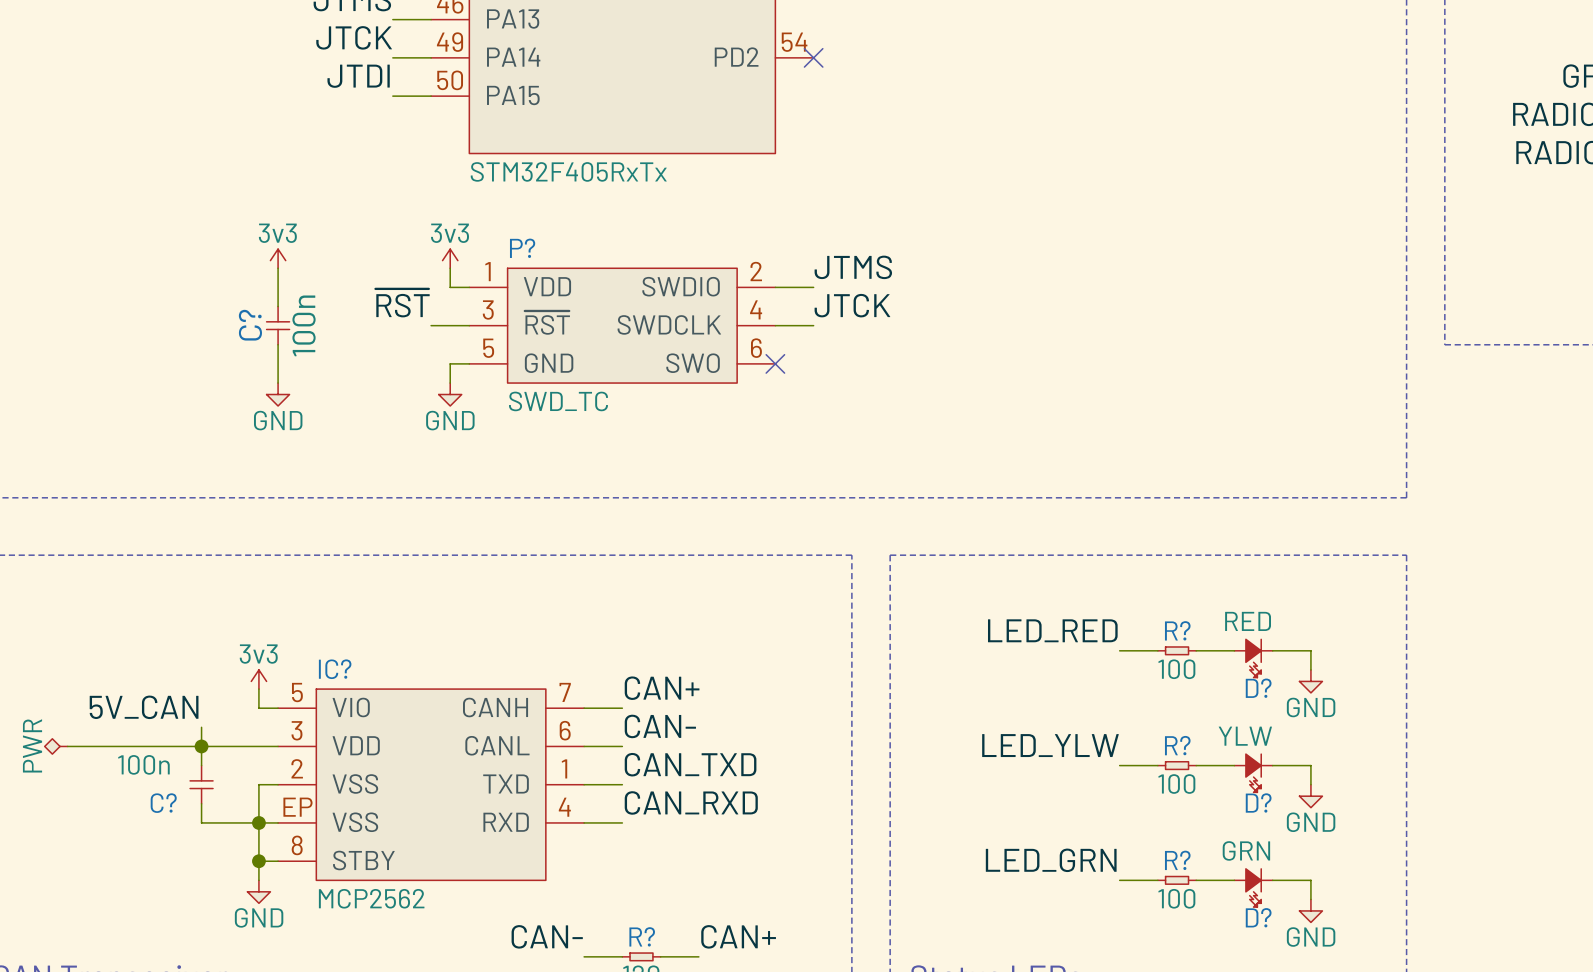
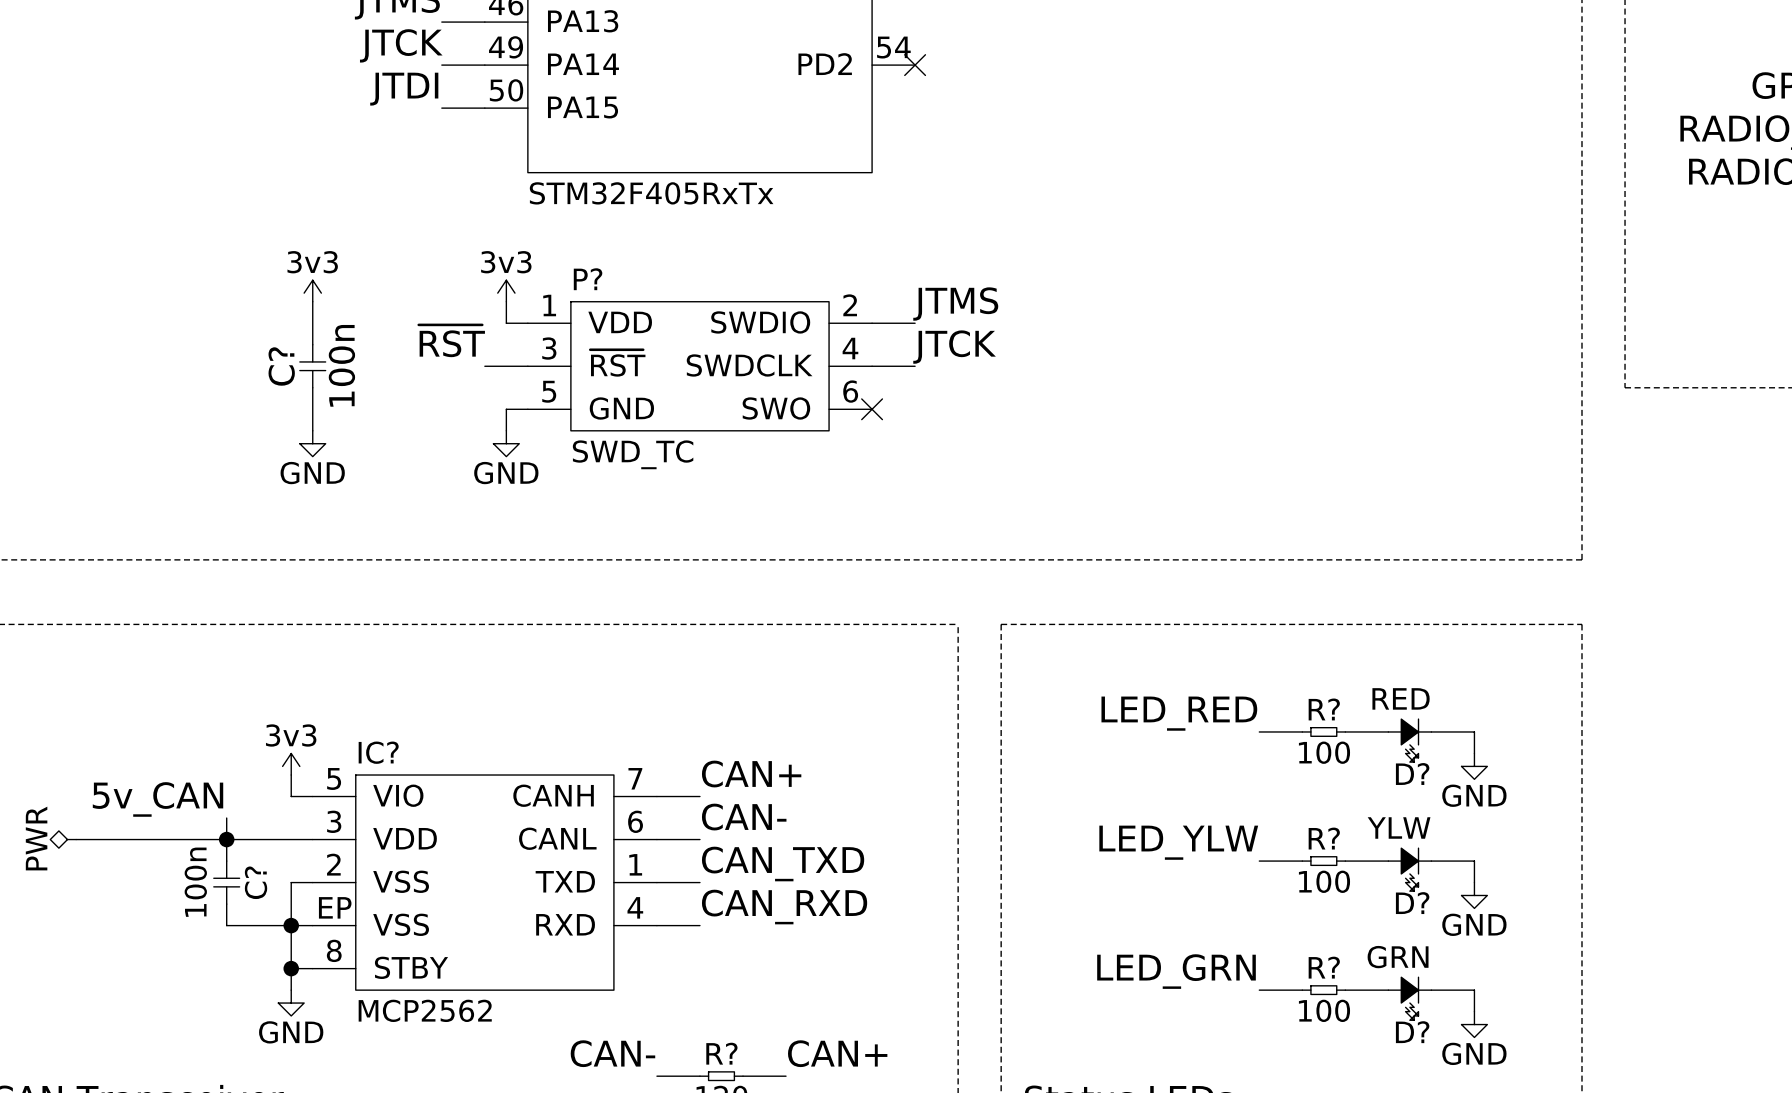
label: 5V_CAN (144, 707) -> 5v_CAN (158, 799)
C? value rotation: 0° (143, 764) -> 90° counterclockwise (195, 882)
C? name rotation: 0° (163, 803) -> 90° counterclockwise (256, 882)
C? name position: C? (163, 803) -> C? (256, 882)

